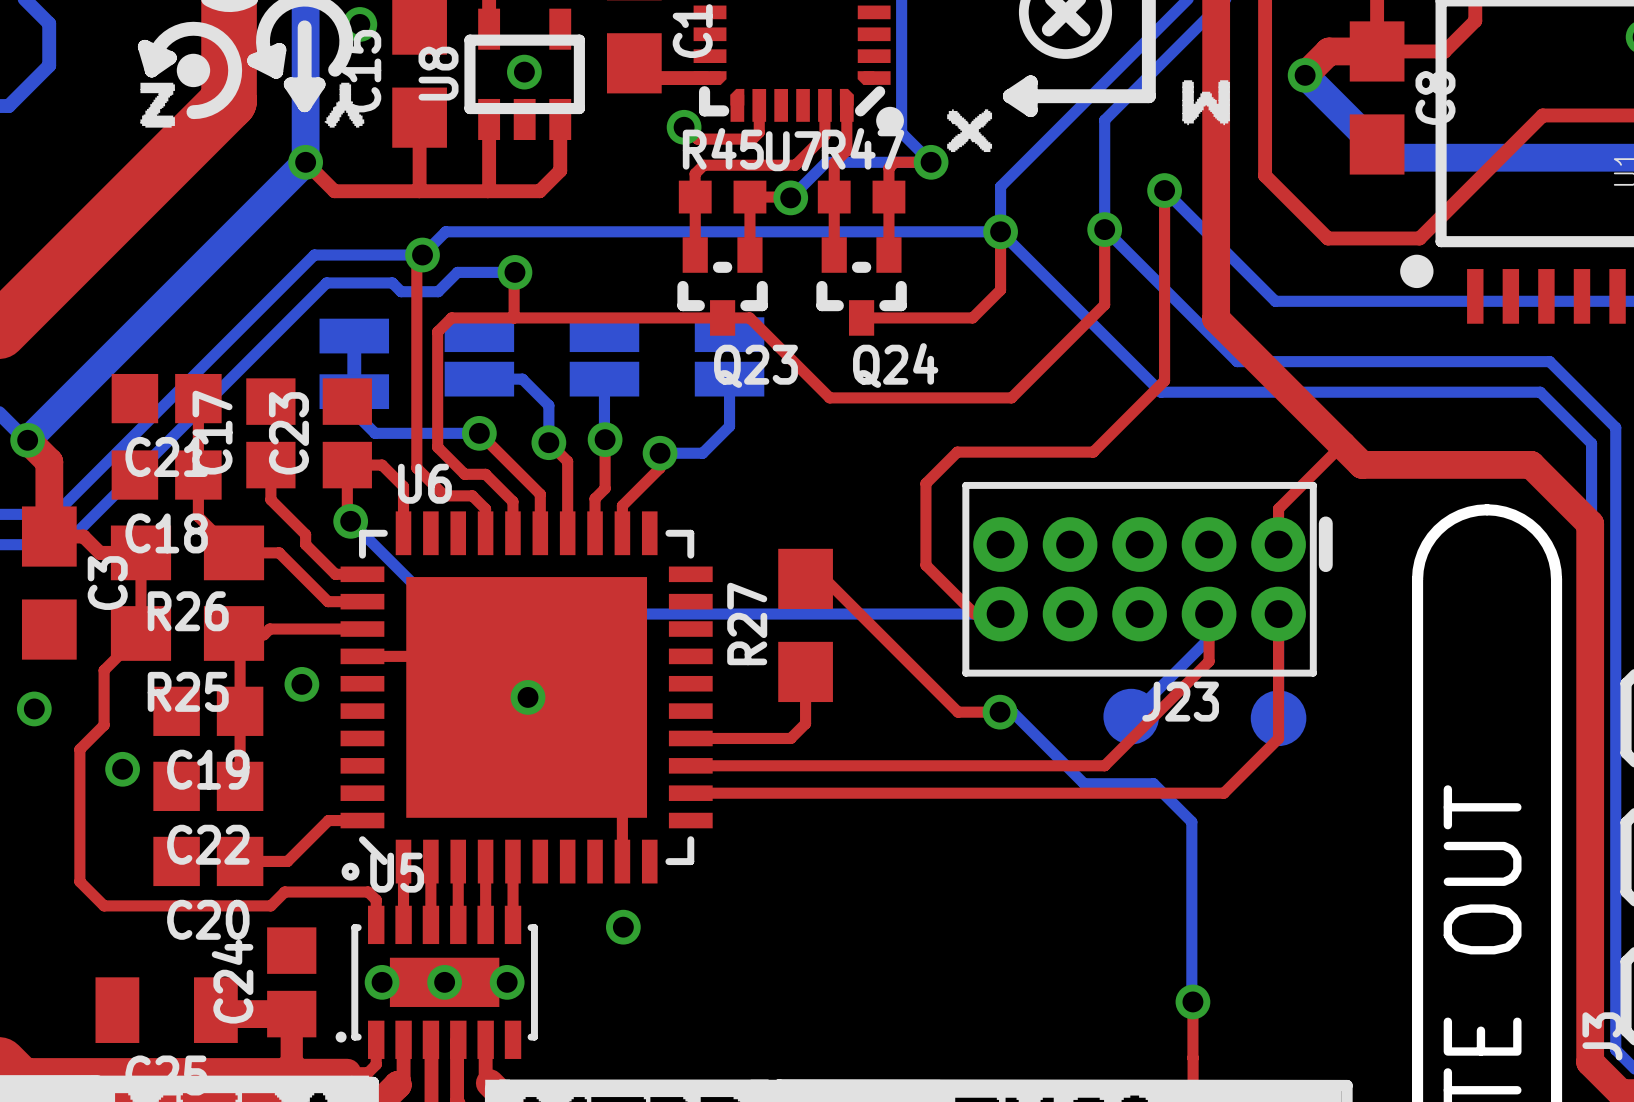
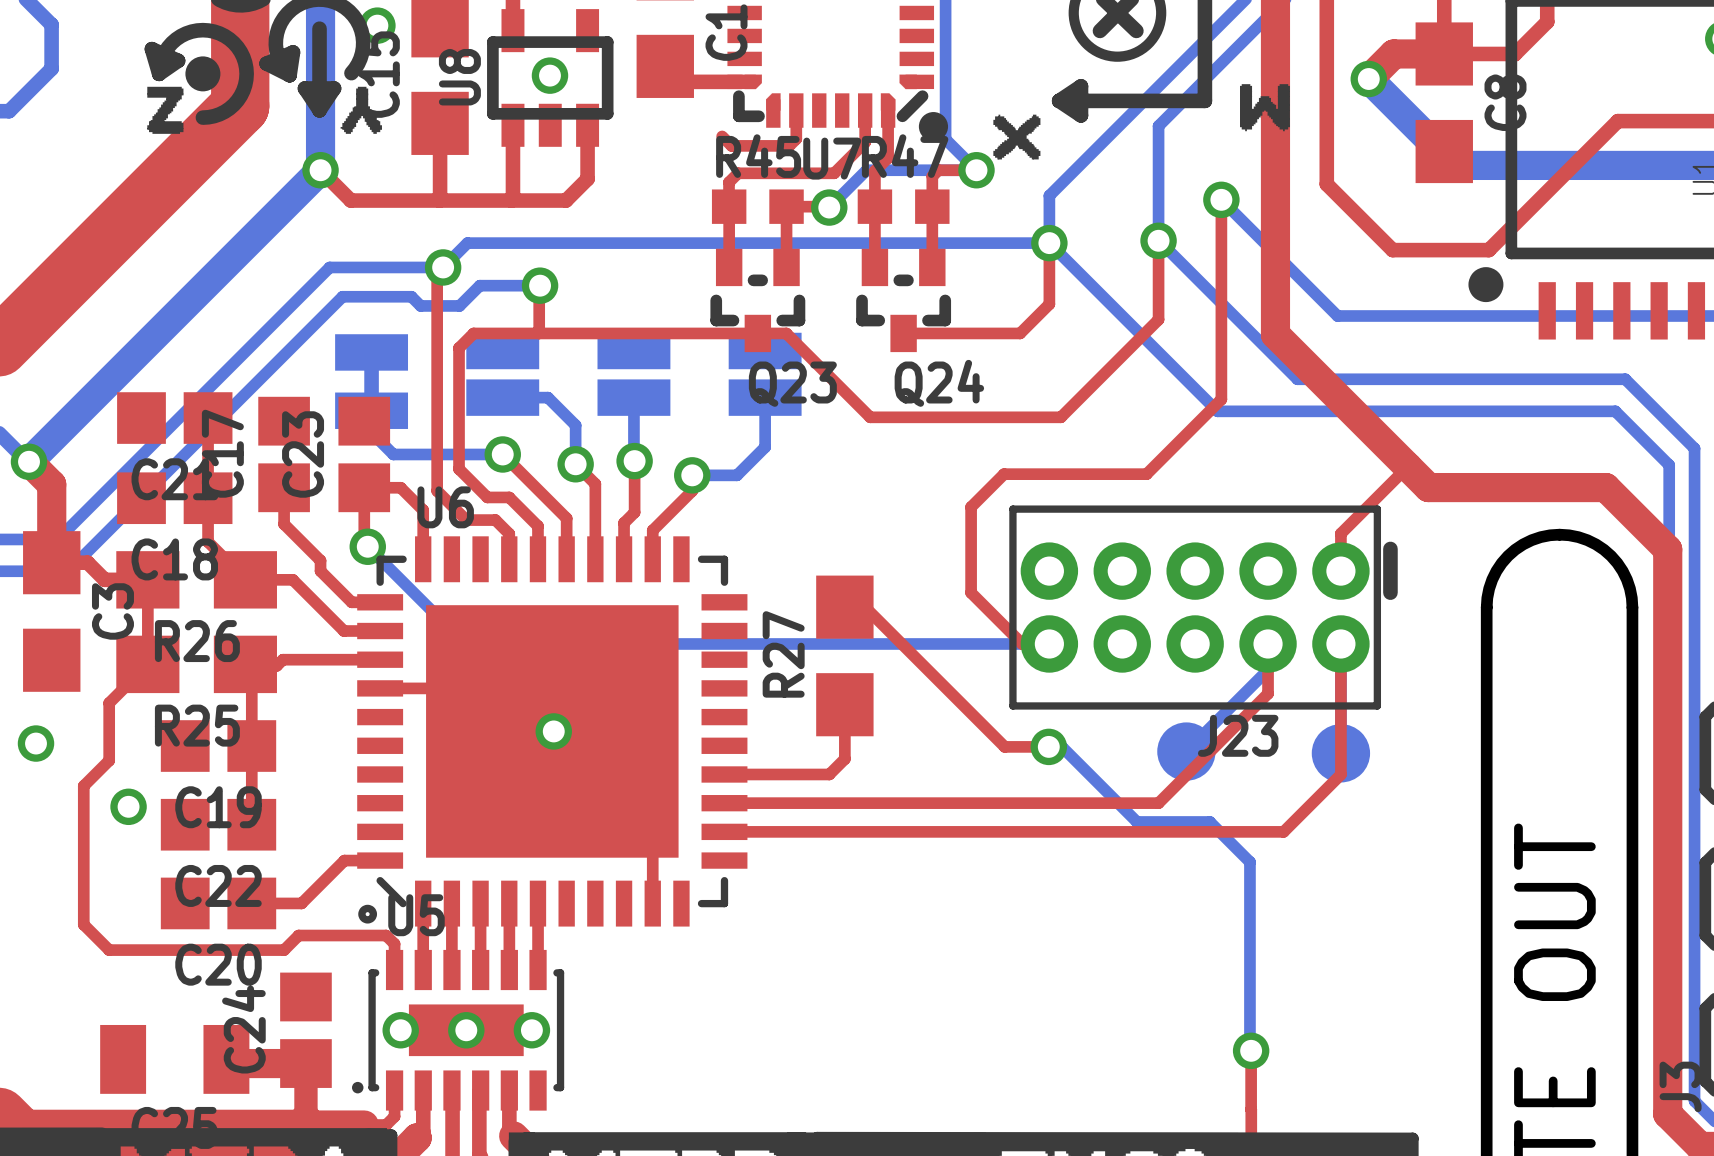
via: (684, 127) -> none
via: (301, 684) -> none
via: (623, 927) -> none

